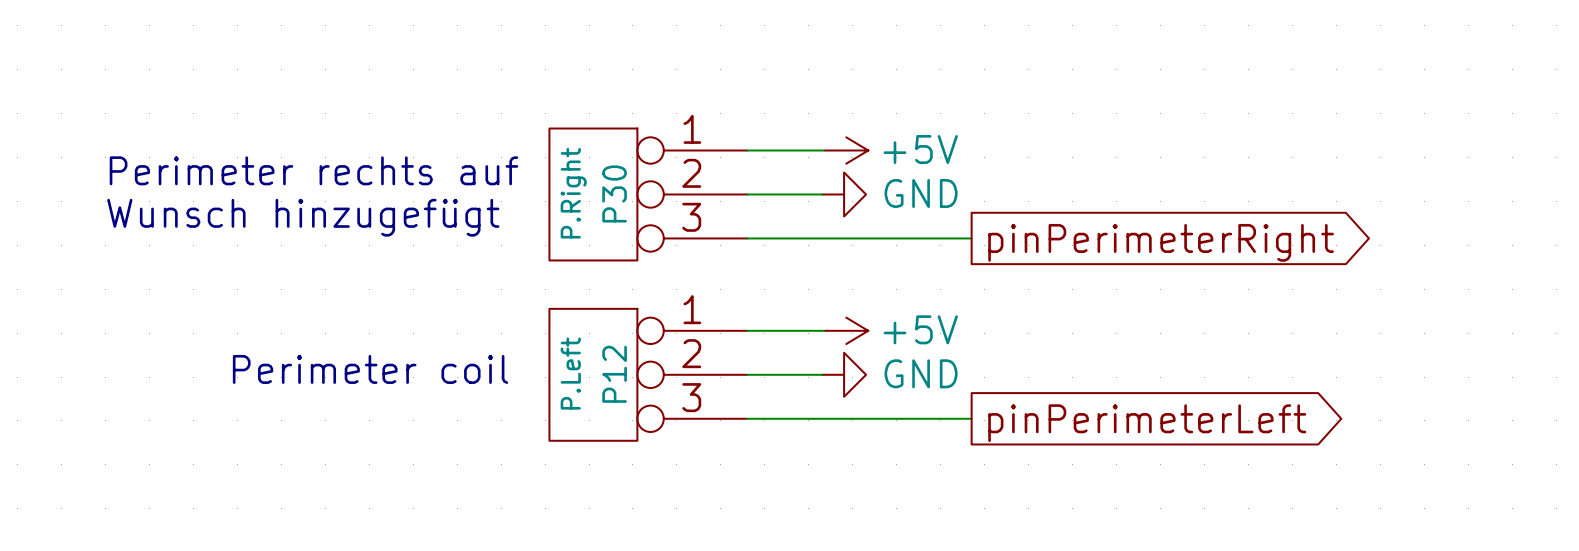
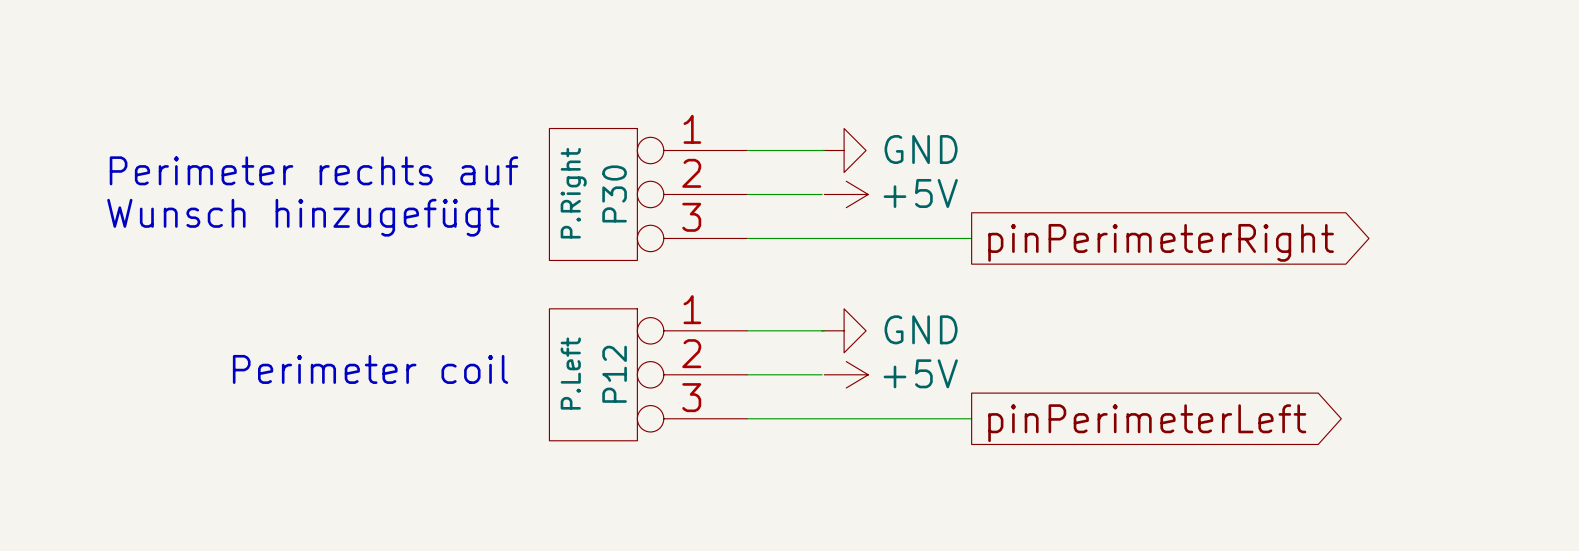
power symbol: +5V (846, 150) -> GND (844, 150)
power symbol: GND (844, 194) -> +5V (846, 194)
power symbol: +5V (846, 330) -> GND (844, 330)
power symbol: GND (844, 374) -> +5V (846, 374)

